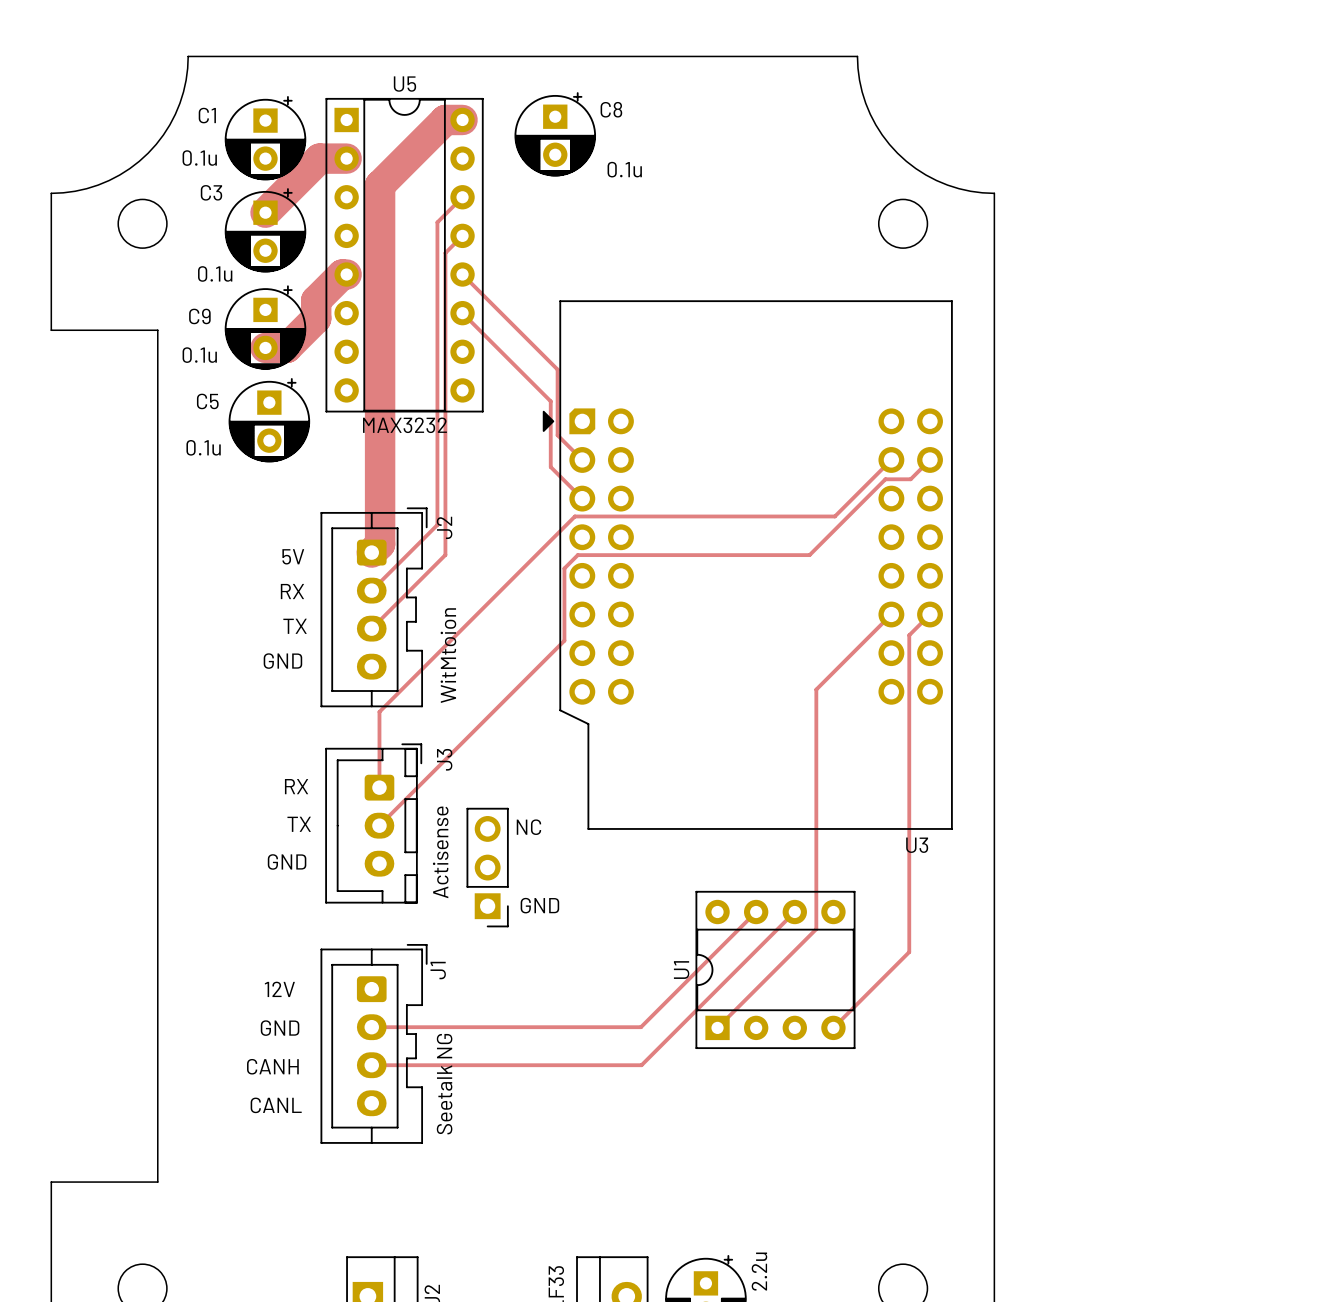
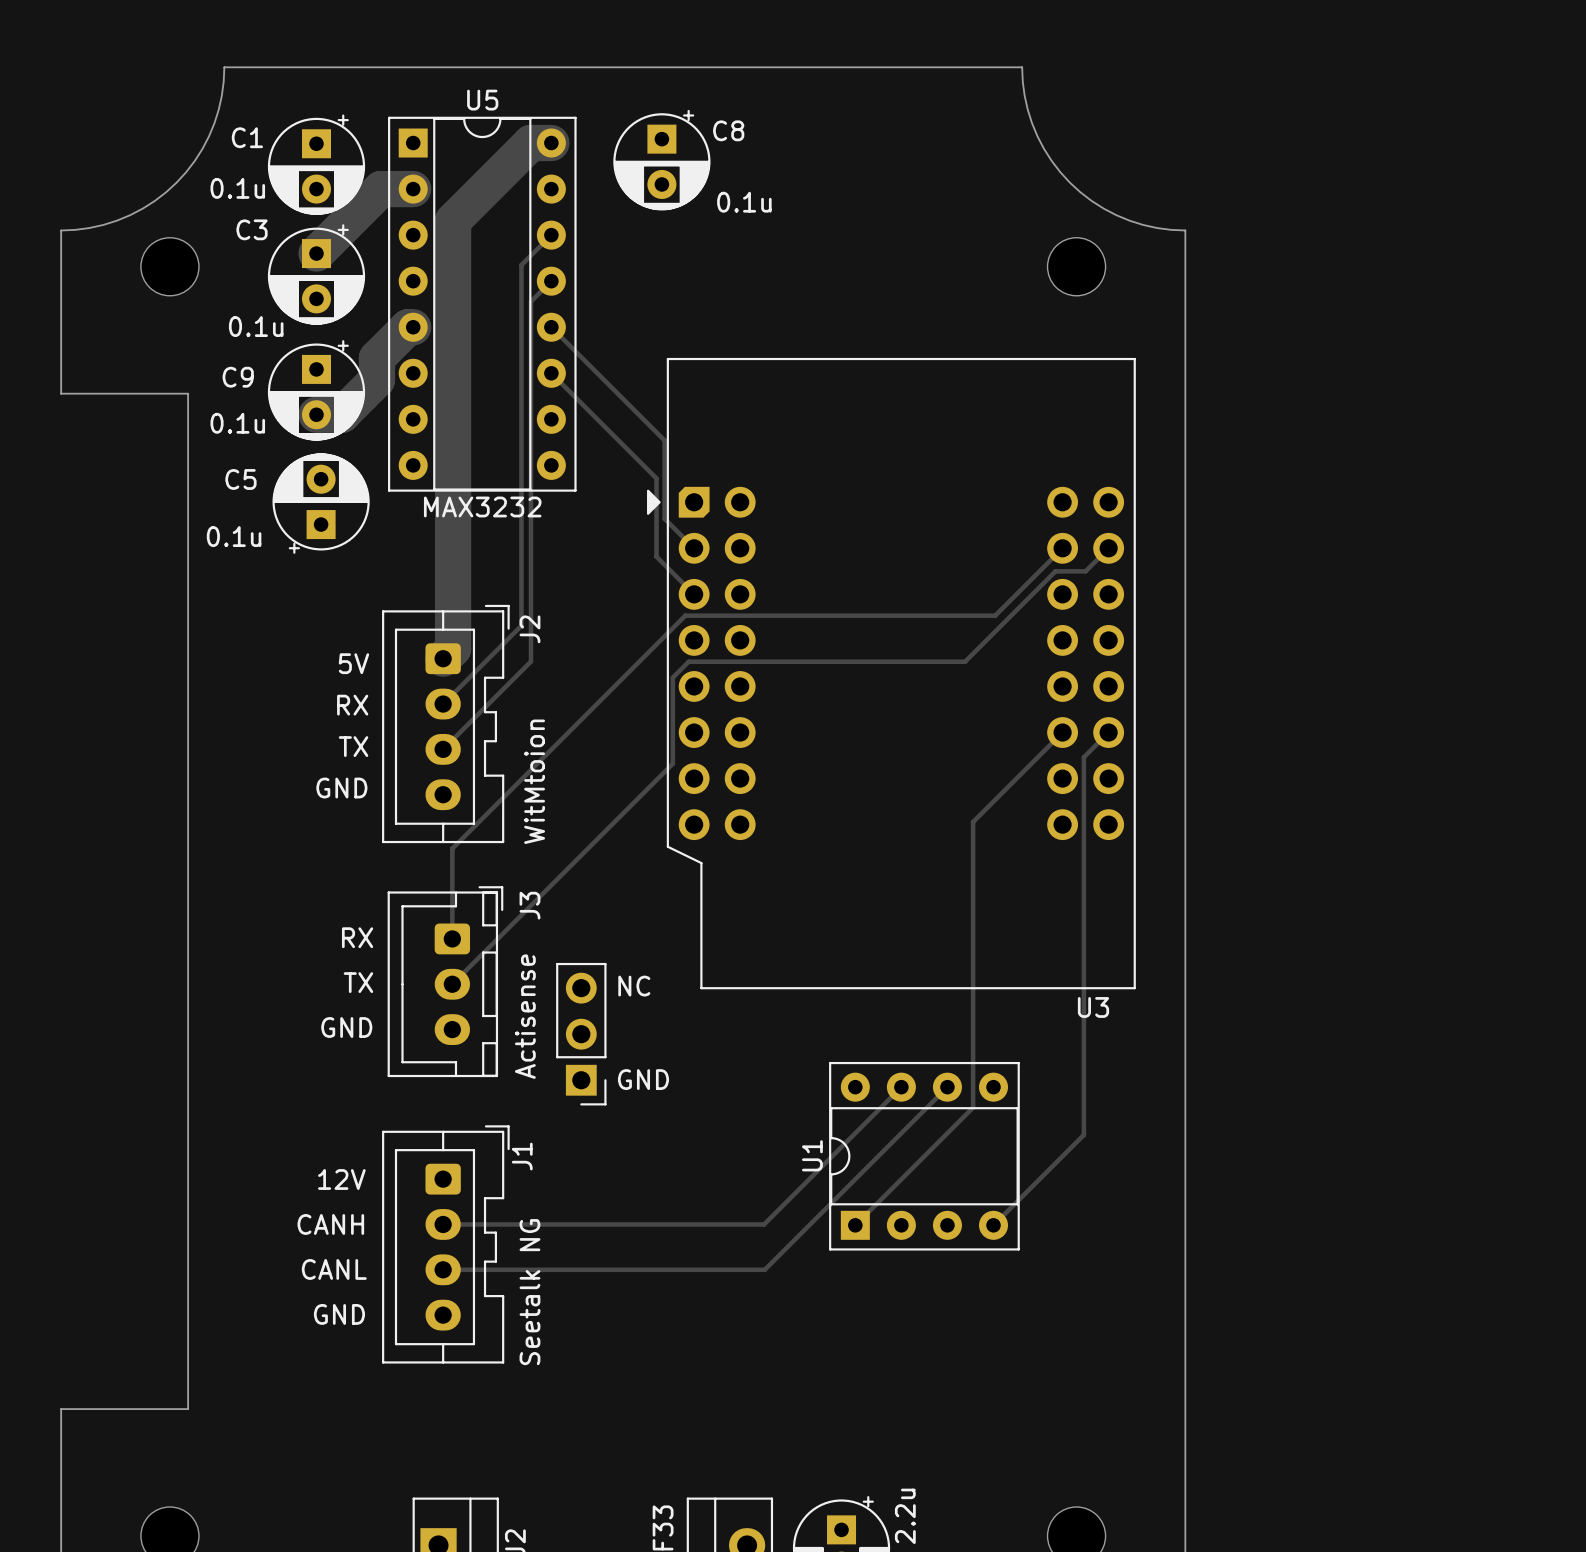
C5 rotation: 0° (269, 420) -> 180° (321, 503)
text: GND (280, 1028) -> CANH (330, 1224)
text: CANH (272, 1066) -> CANL (334, 1269)
text: CANL (276, 1105) -> GND (339, 1314)

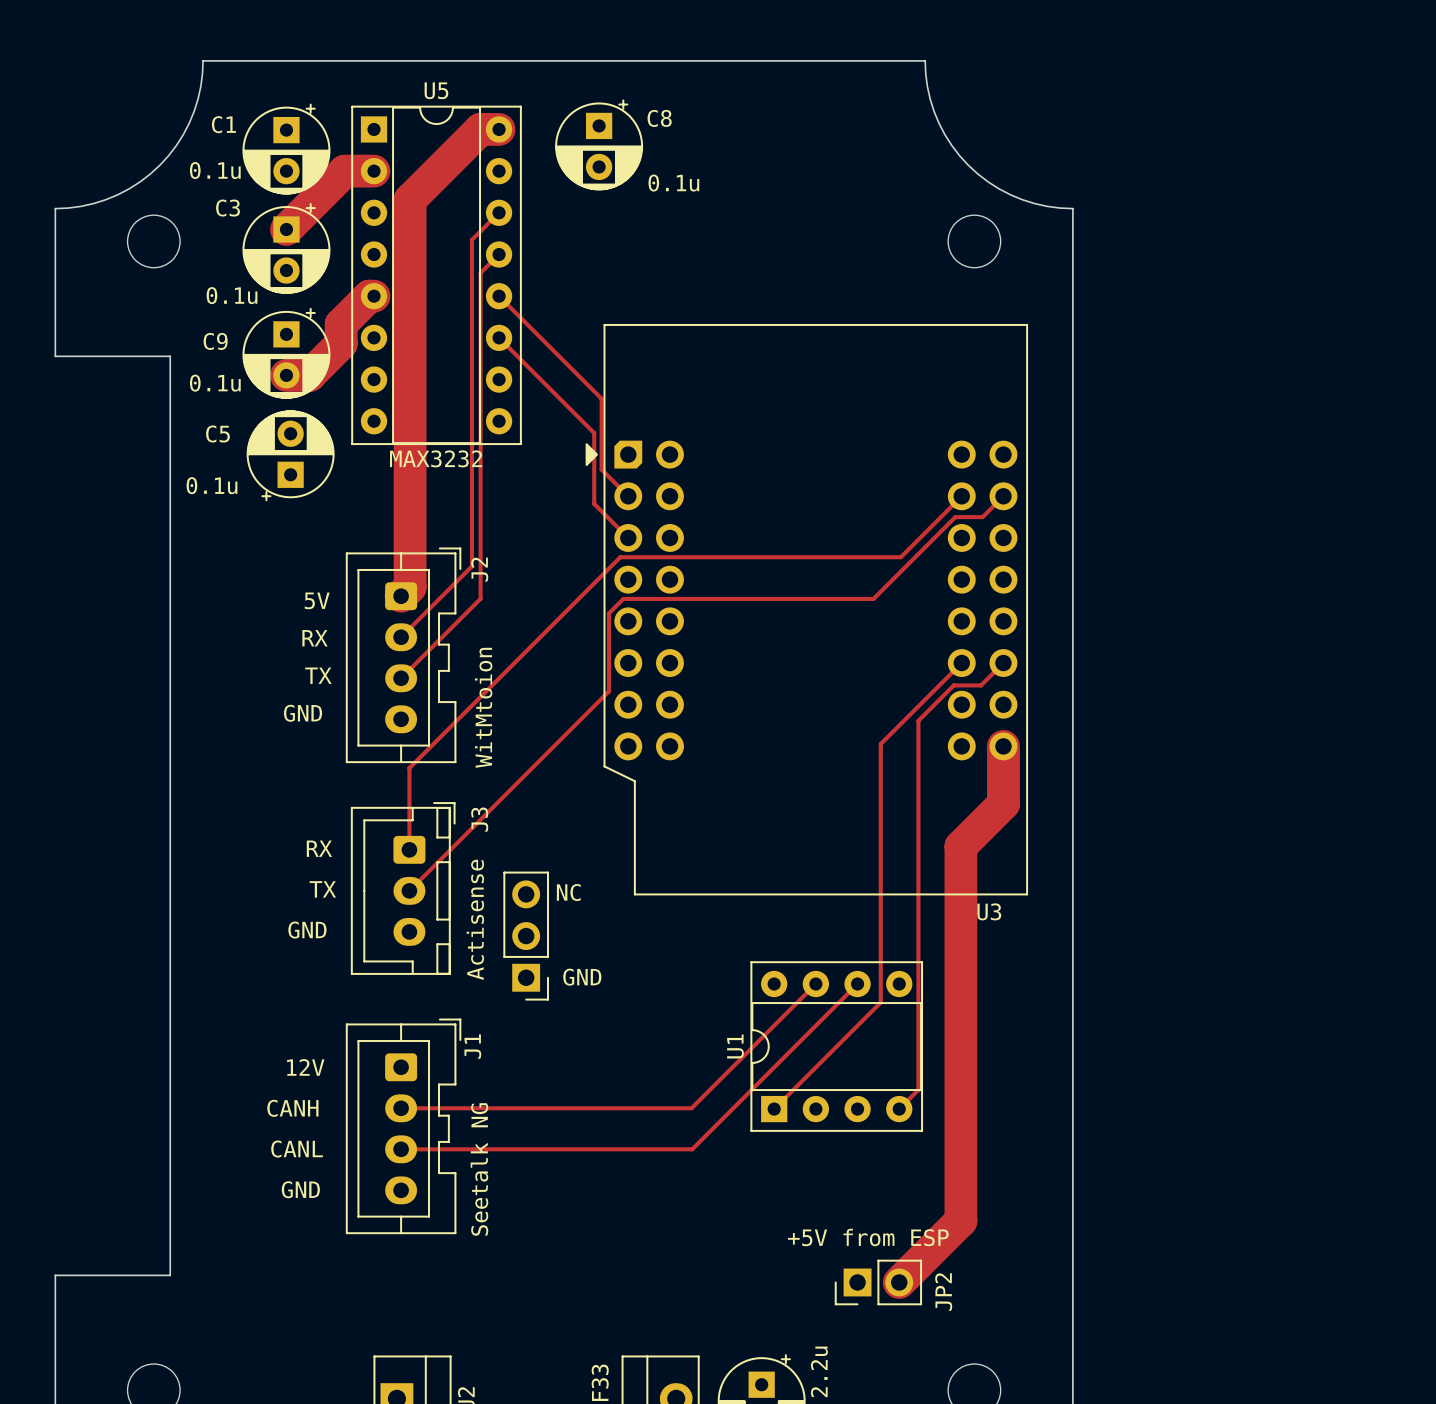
track: (1083, 757) (1083, 1134) (1014, 1204) -> (981, 685) (953, 685) (918, 720) (918, 1089)
track: none -> (1003, 746) (1003, 803) (960, 846) (960, 1220) (899, 1282)
JP2: none -> +5V from ESP (878, 1282)

